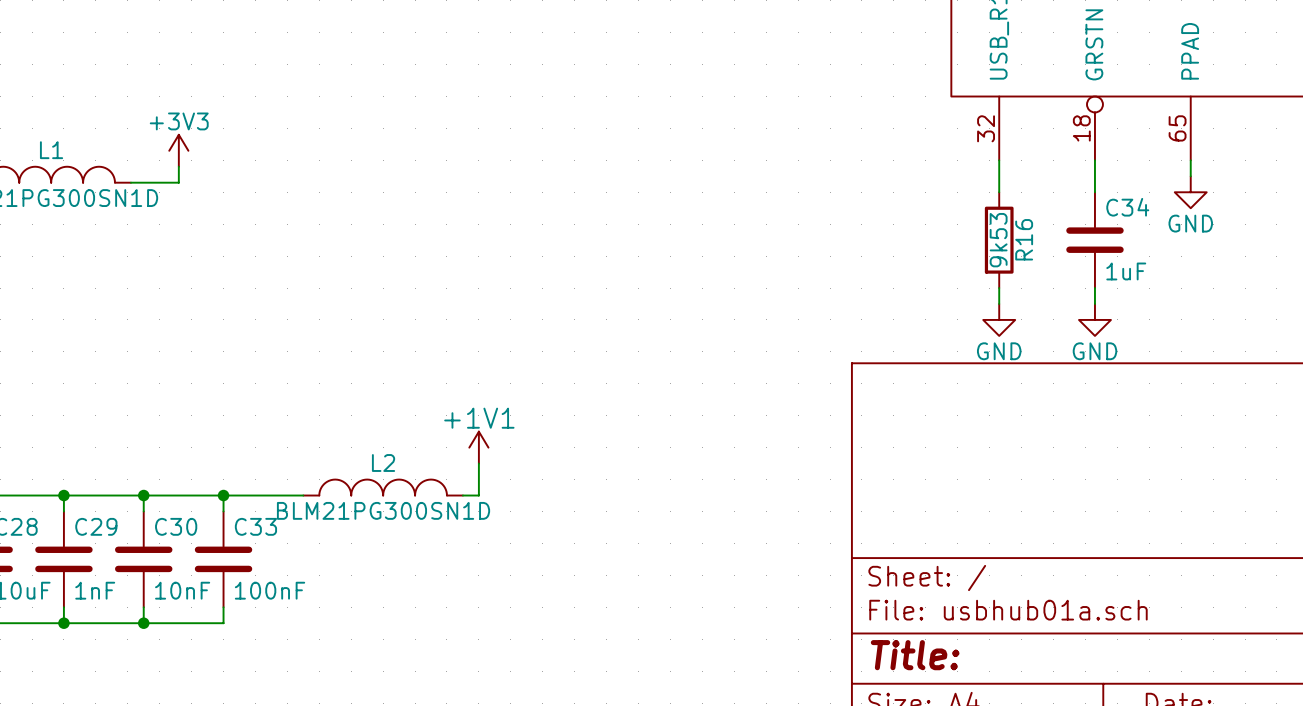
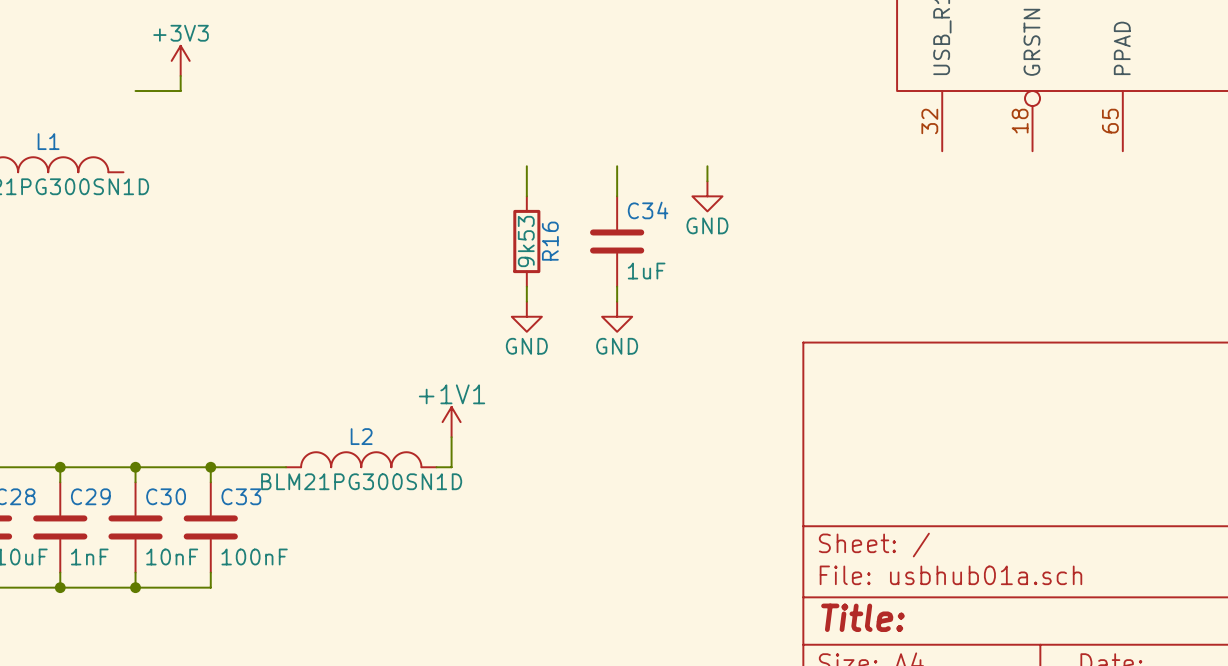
power symbol position: +3V3 (178, 150) -> +3V3 (180, 60)
wire: (999, 160) (999, 192) -> none
wire: (1094, 160) (1094, 192) -> none
wire: (1190, 160) (1190, 176) -> none
wire: (178, 166) (178, 182) (130, 182) -> (180, 75) (180, 91) (135, 91)
wire: none -> (526, 166) (526, 196)
wire: none -> (617, 166) (617, 196)
power symbol: GND (1190, 192) -> none
power symbol: none -> GND (707, 196)
R16 position: (999, 240) -> (526, 241)
C34 position: (1094, 240) -> (617, 241)
wire: (999, 288) (999, 303) -> (707, 166) (707, 181)
wire: (1094, 288) (1094, 303) -> none
wire: none -> (526, 286) (526, 301)
wire: none -> (617, 286) (617, 301)
power symbol: GND (999, 319) -> none
power symbol: GND (1094, 319) -> none
power symbol: none -> GND (526, 316)
power symbol: none -> GND (617, 316)

